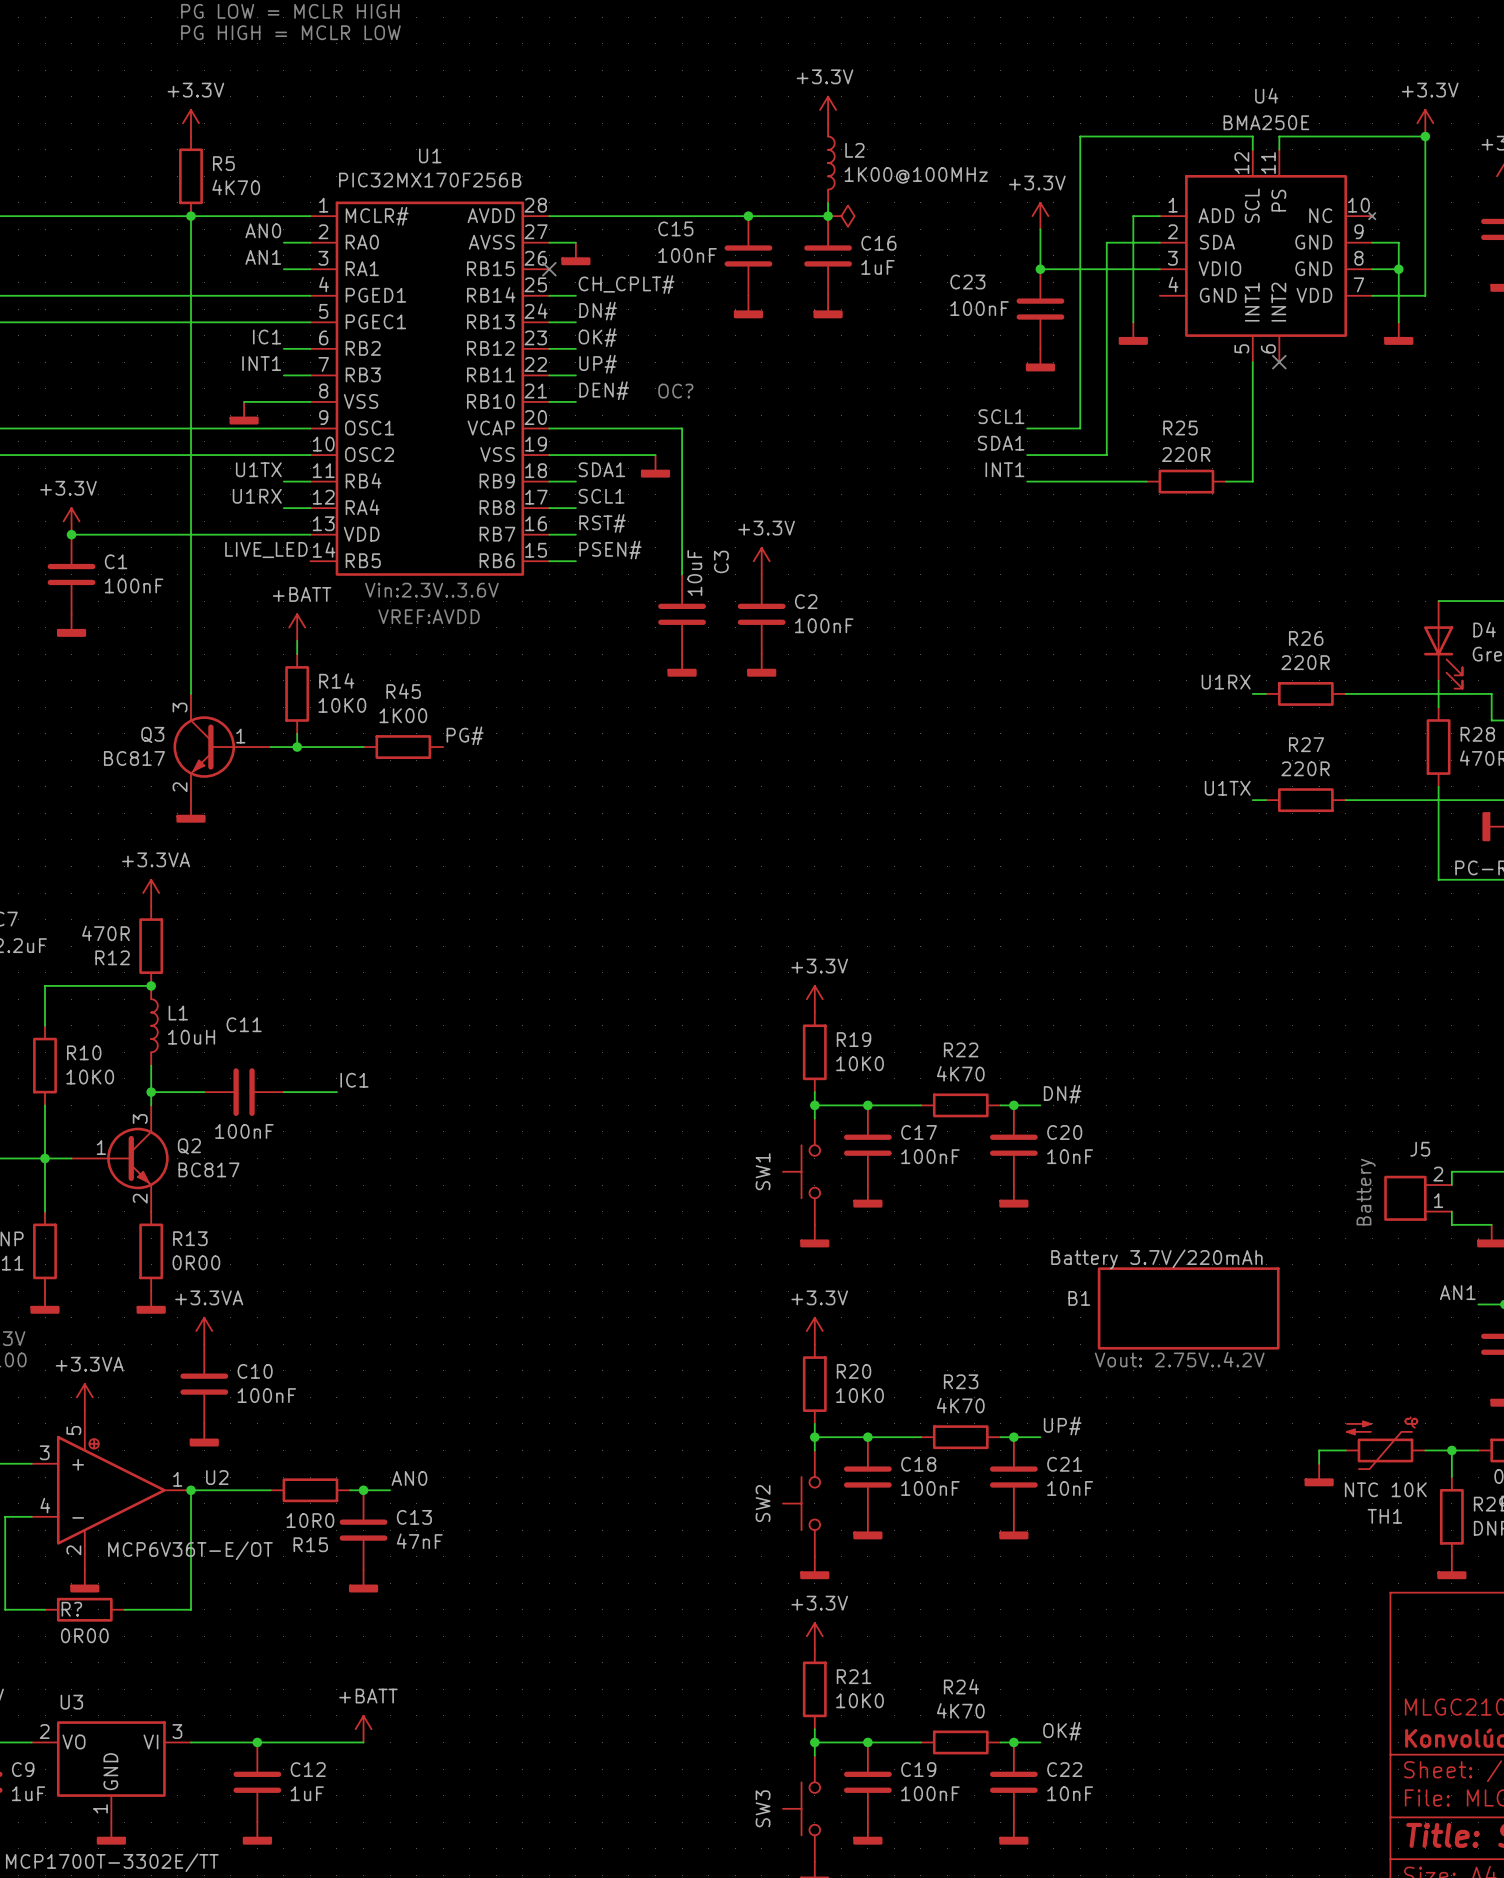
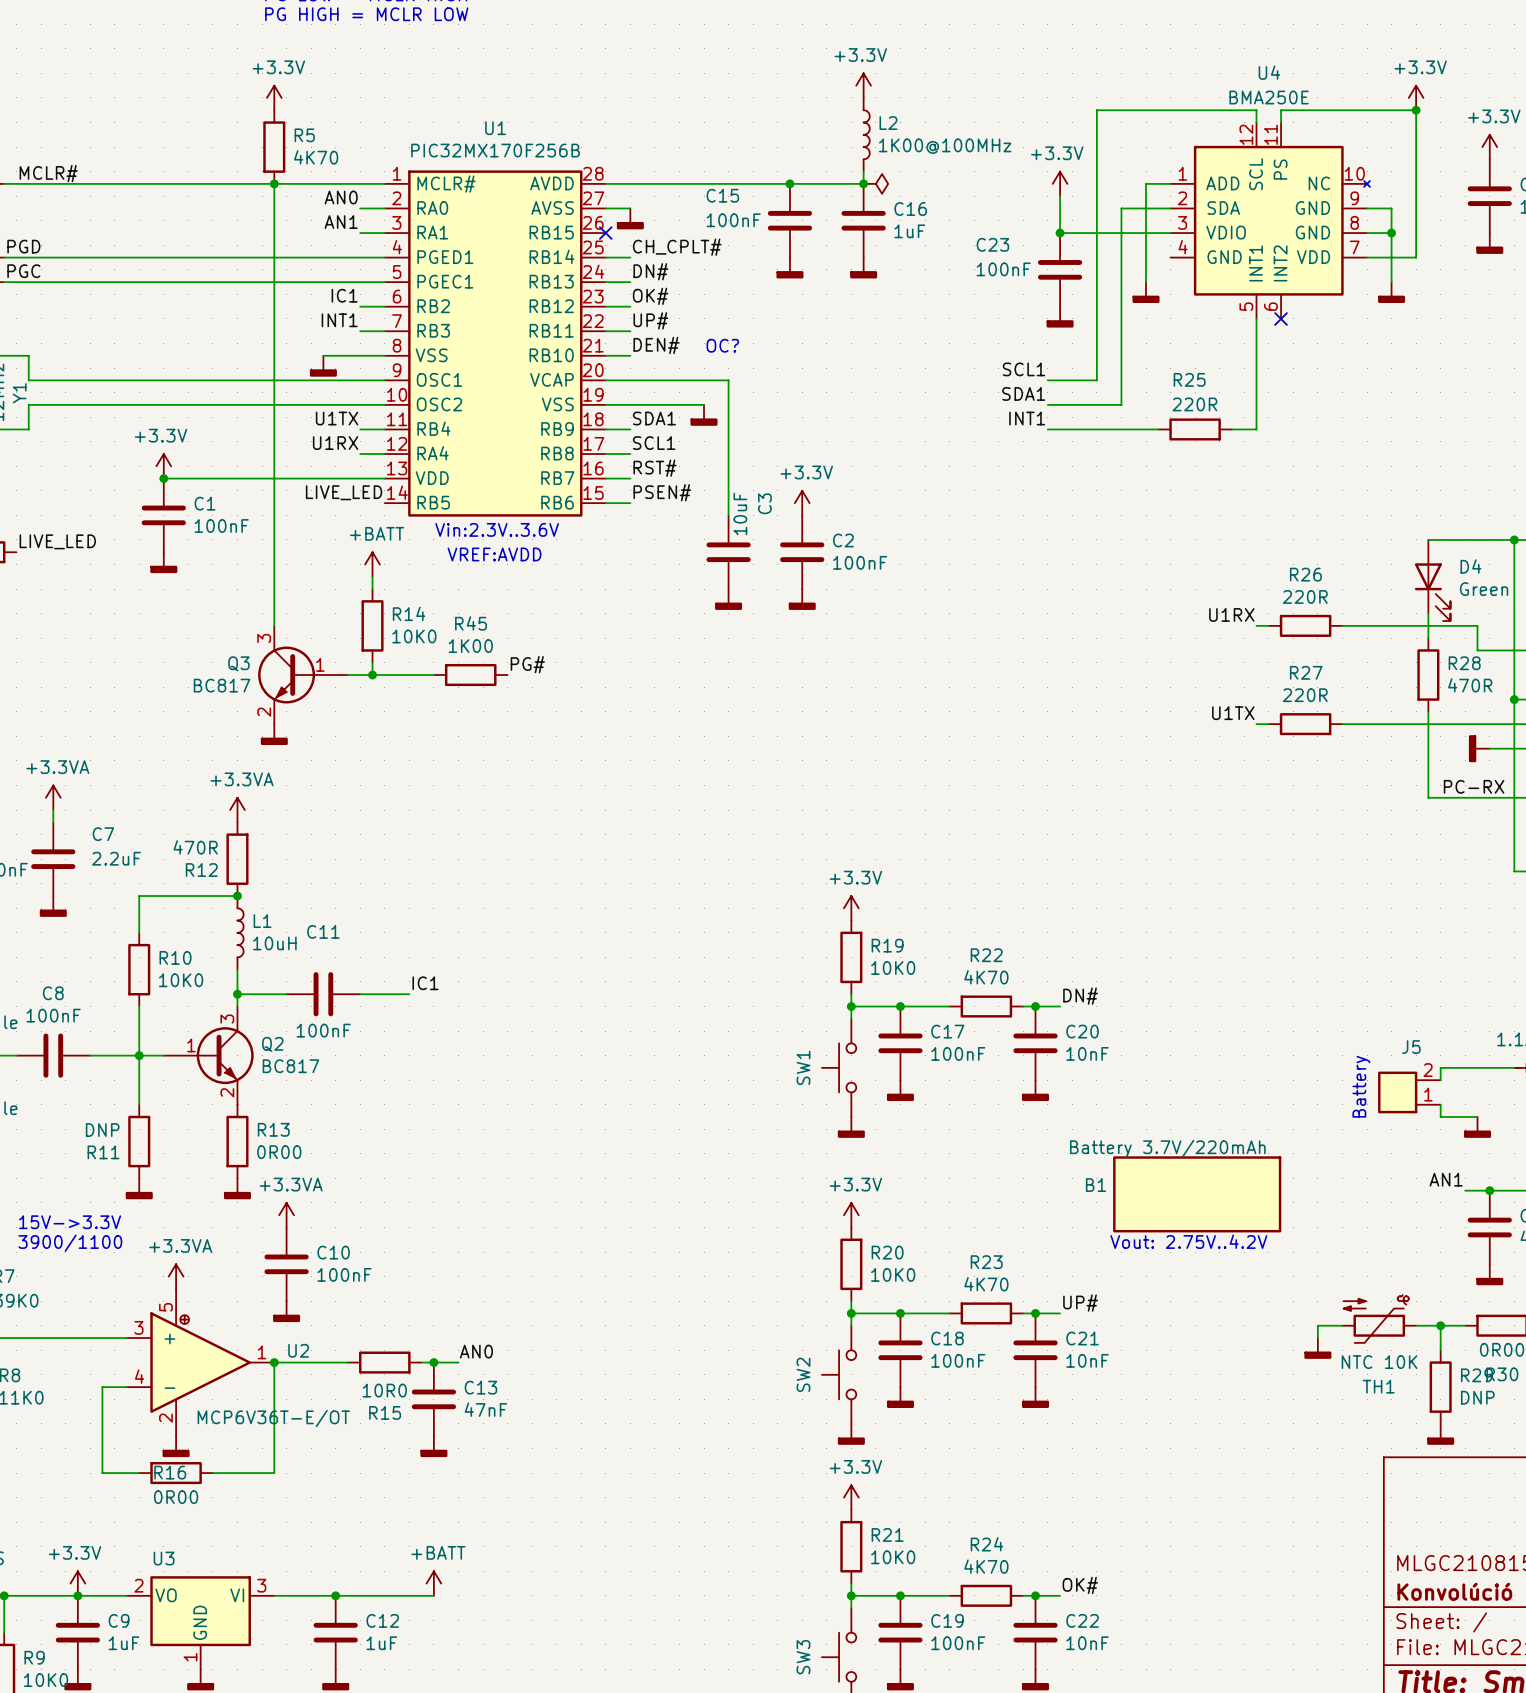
R? name: R? (71, 1609) -> R16 (170, 1472)

